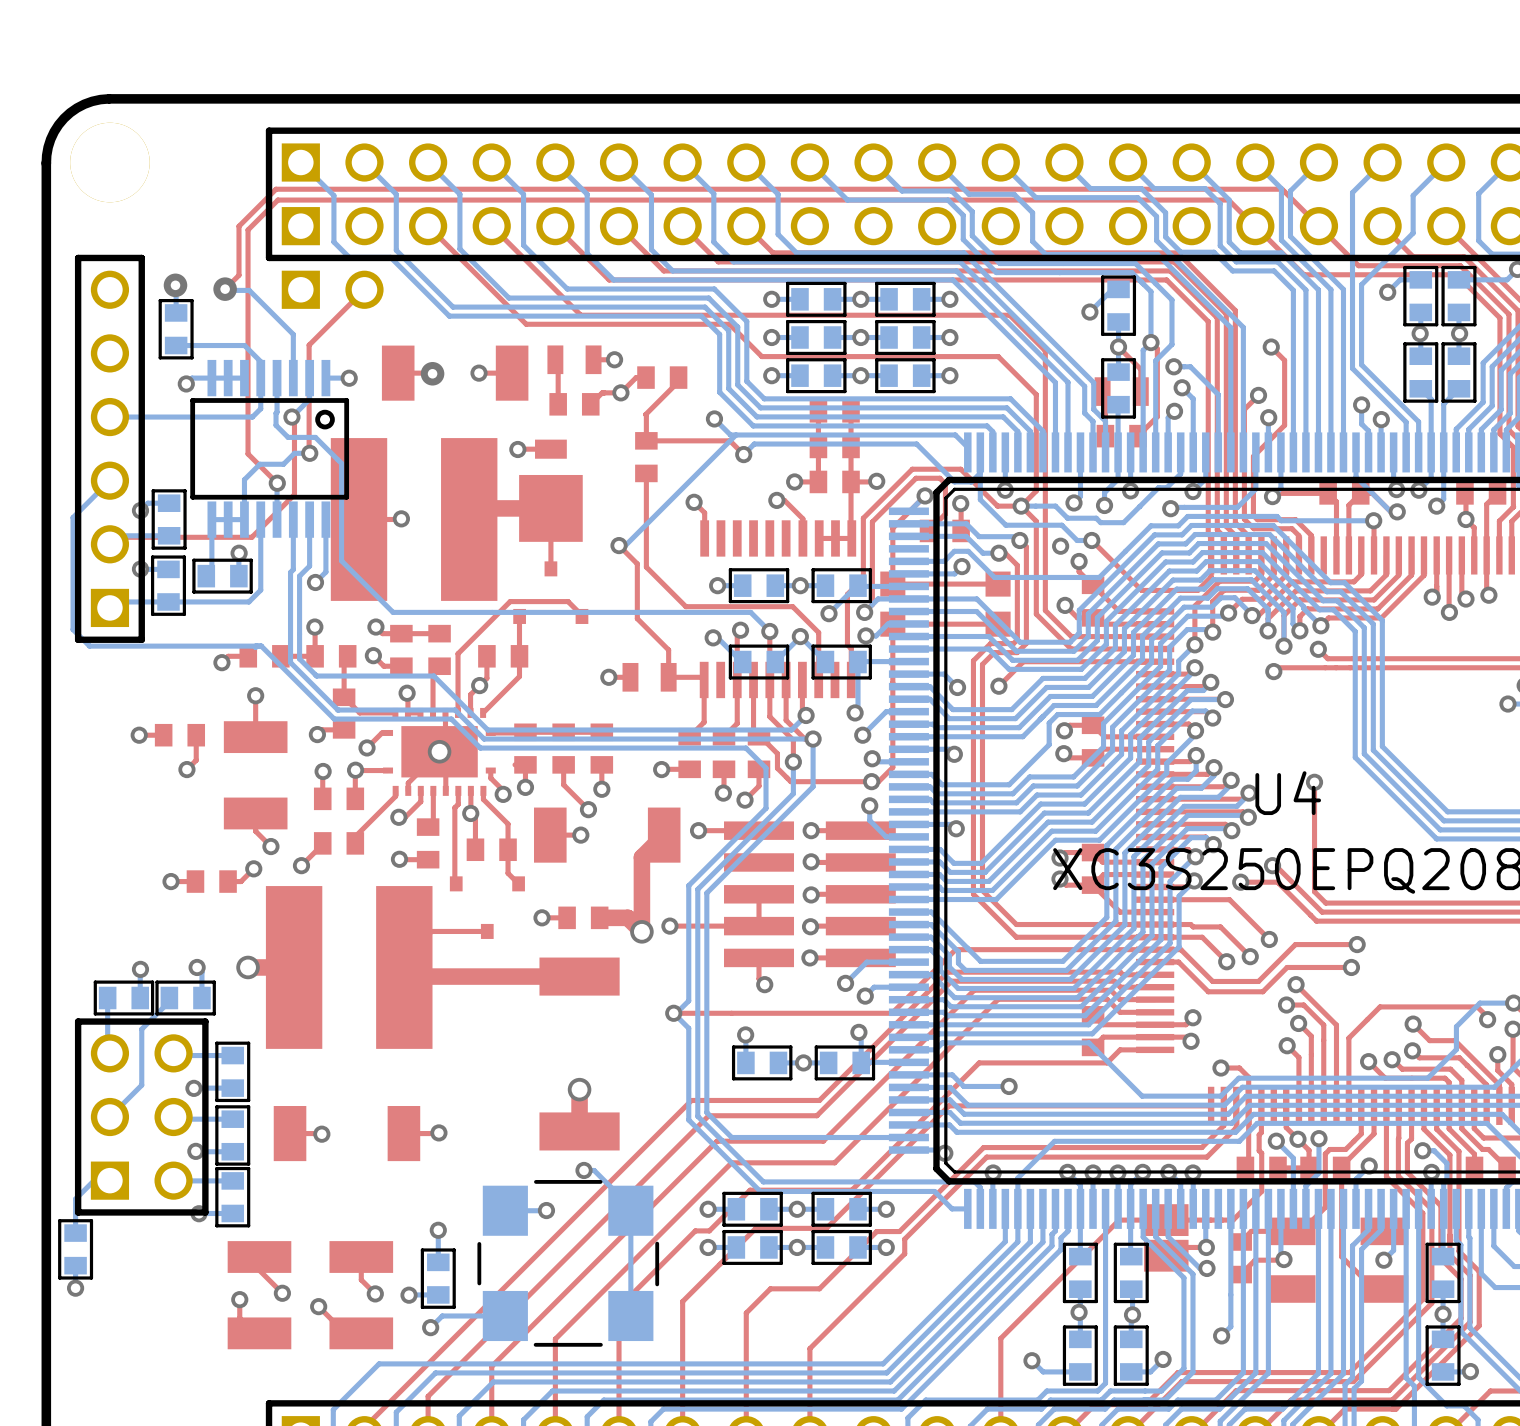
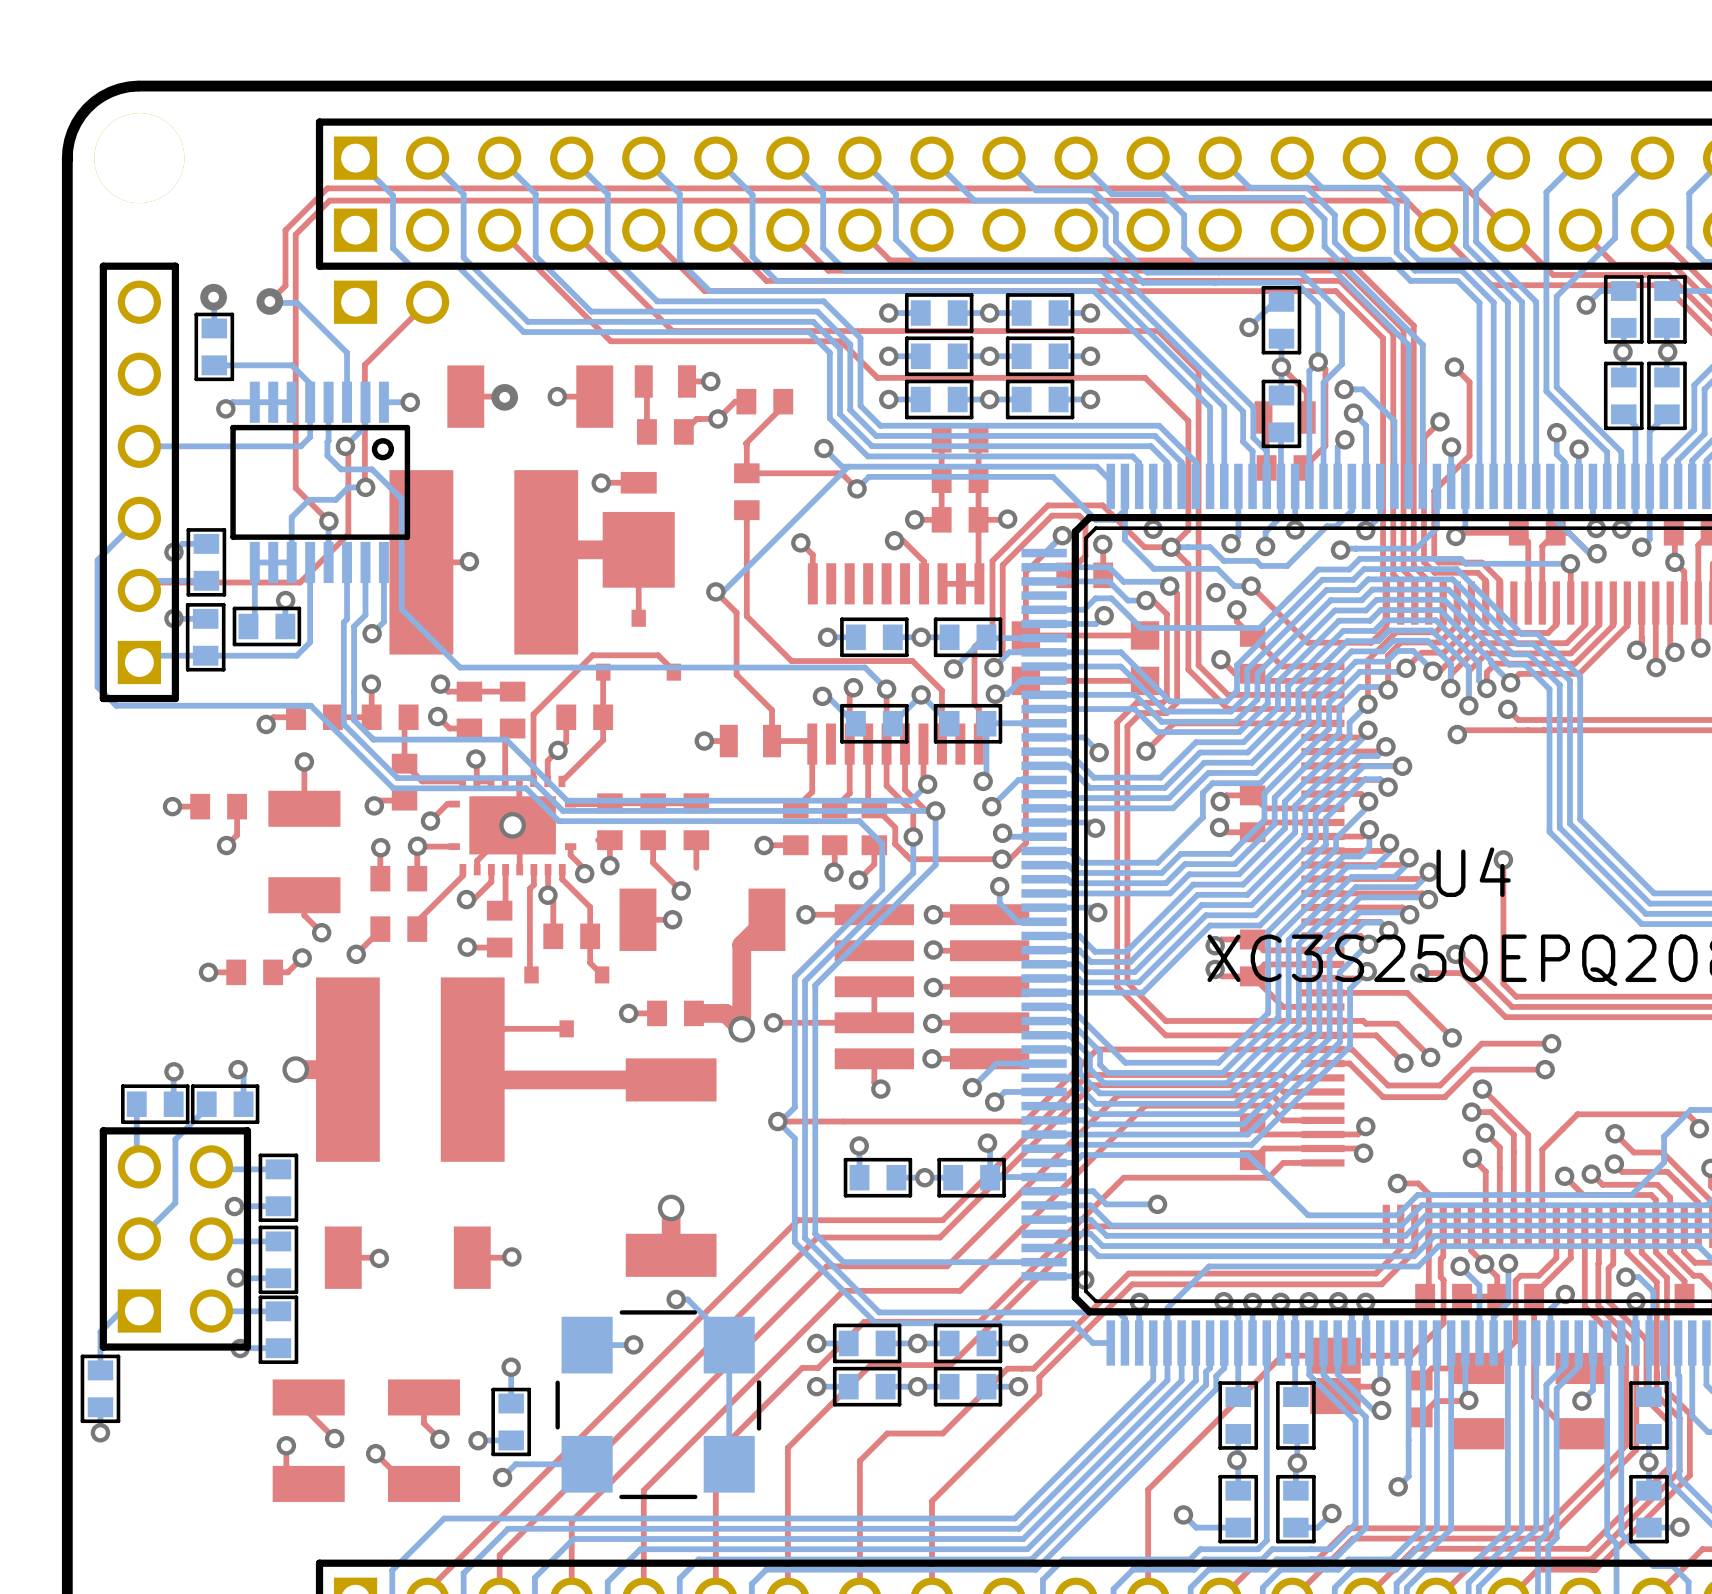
via: (601, 789) -> none

